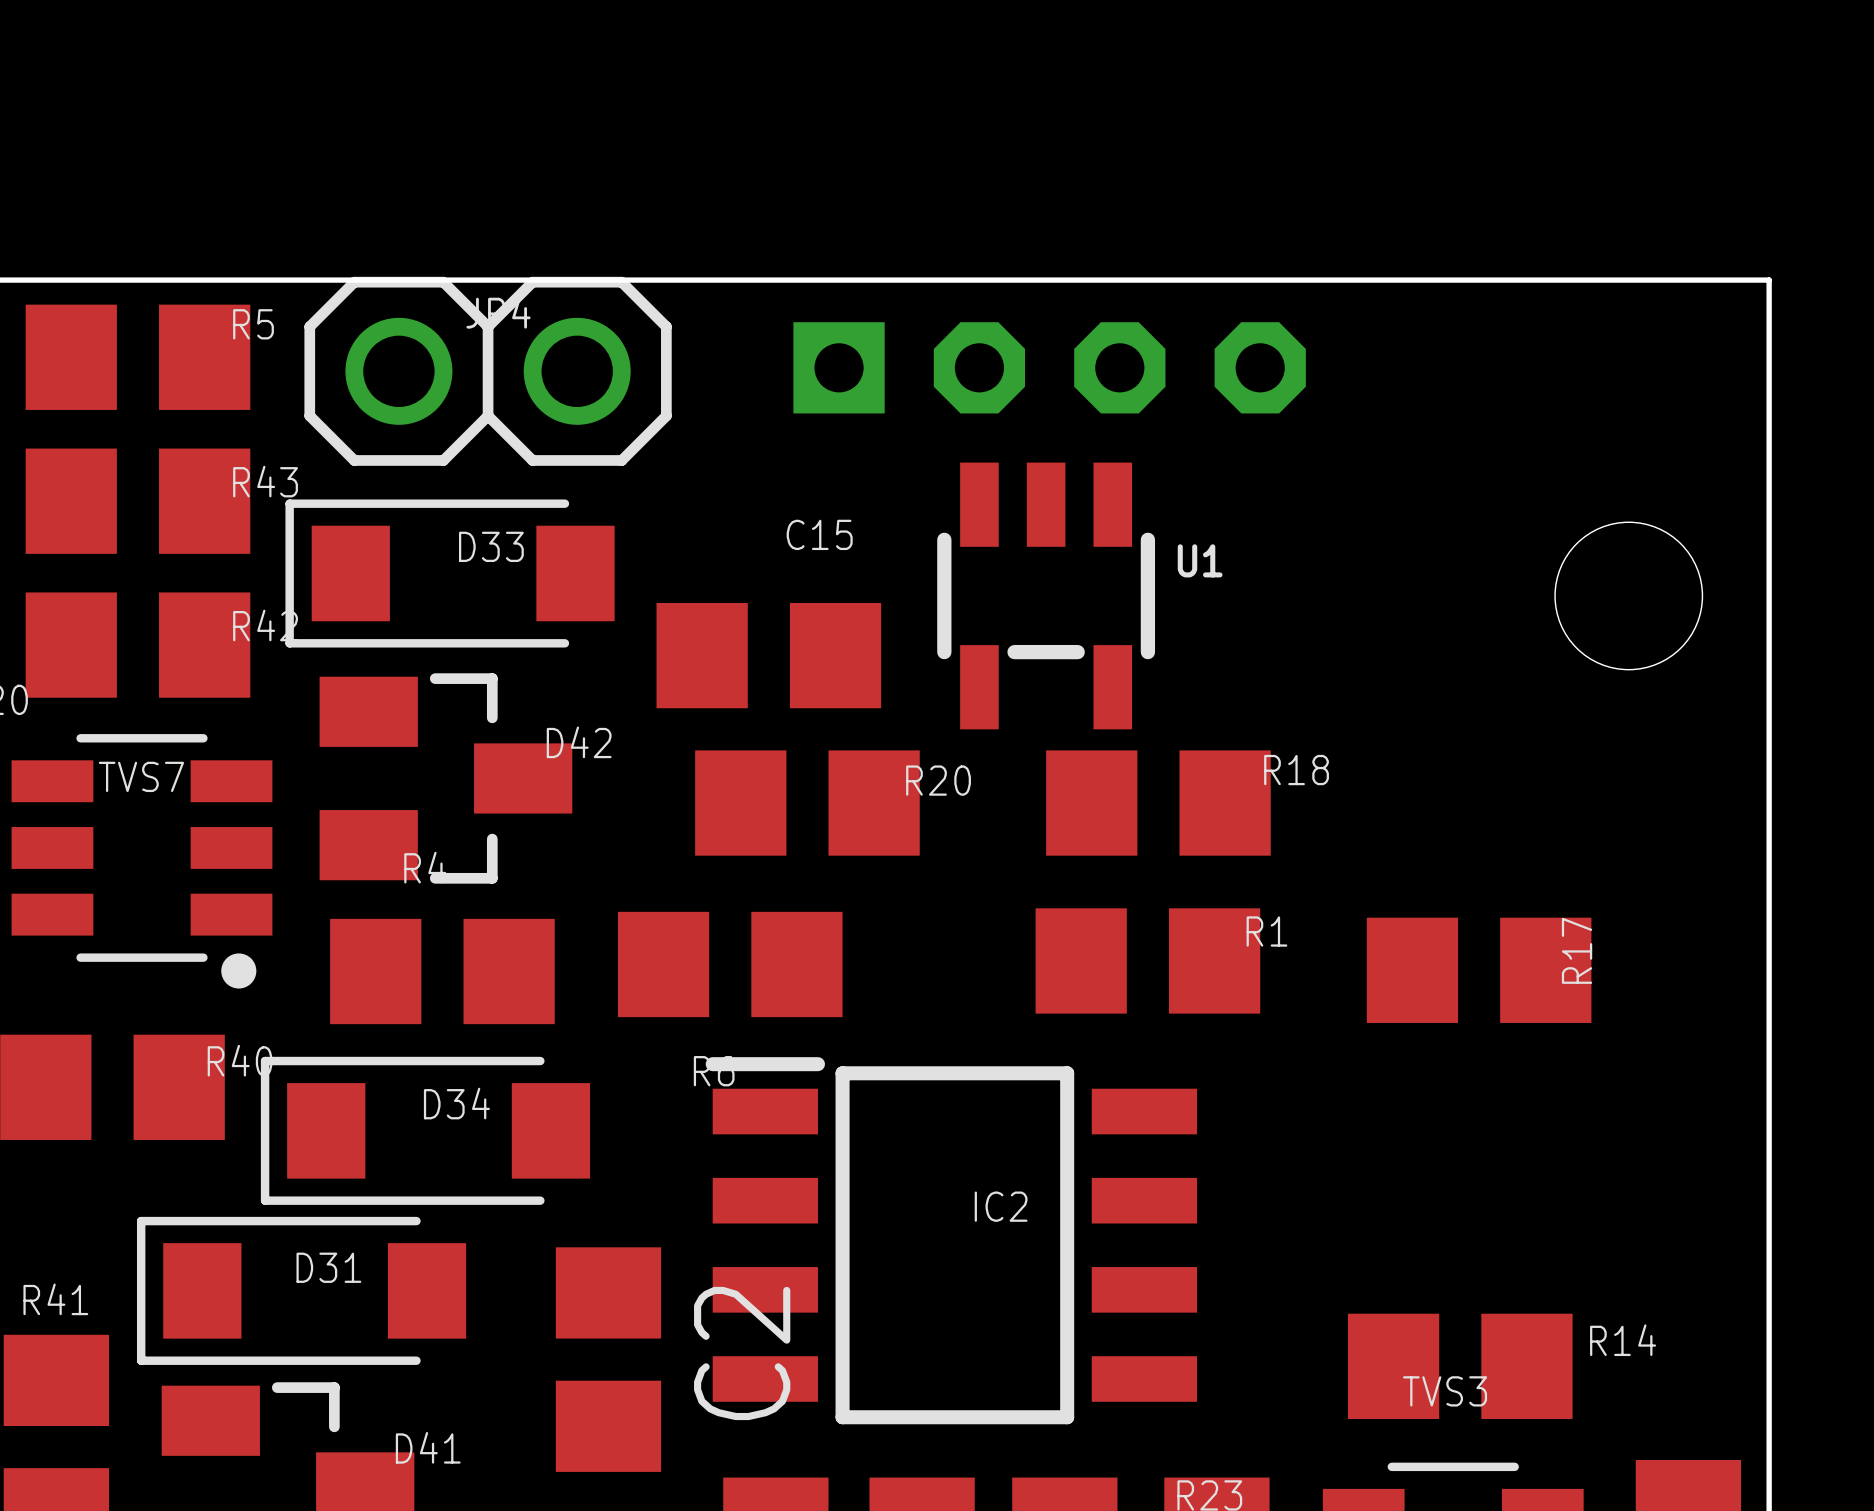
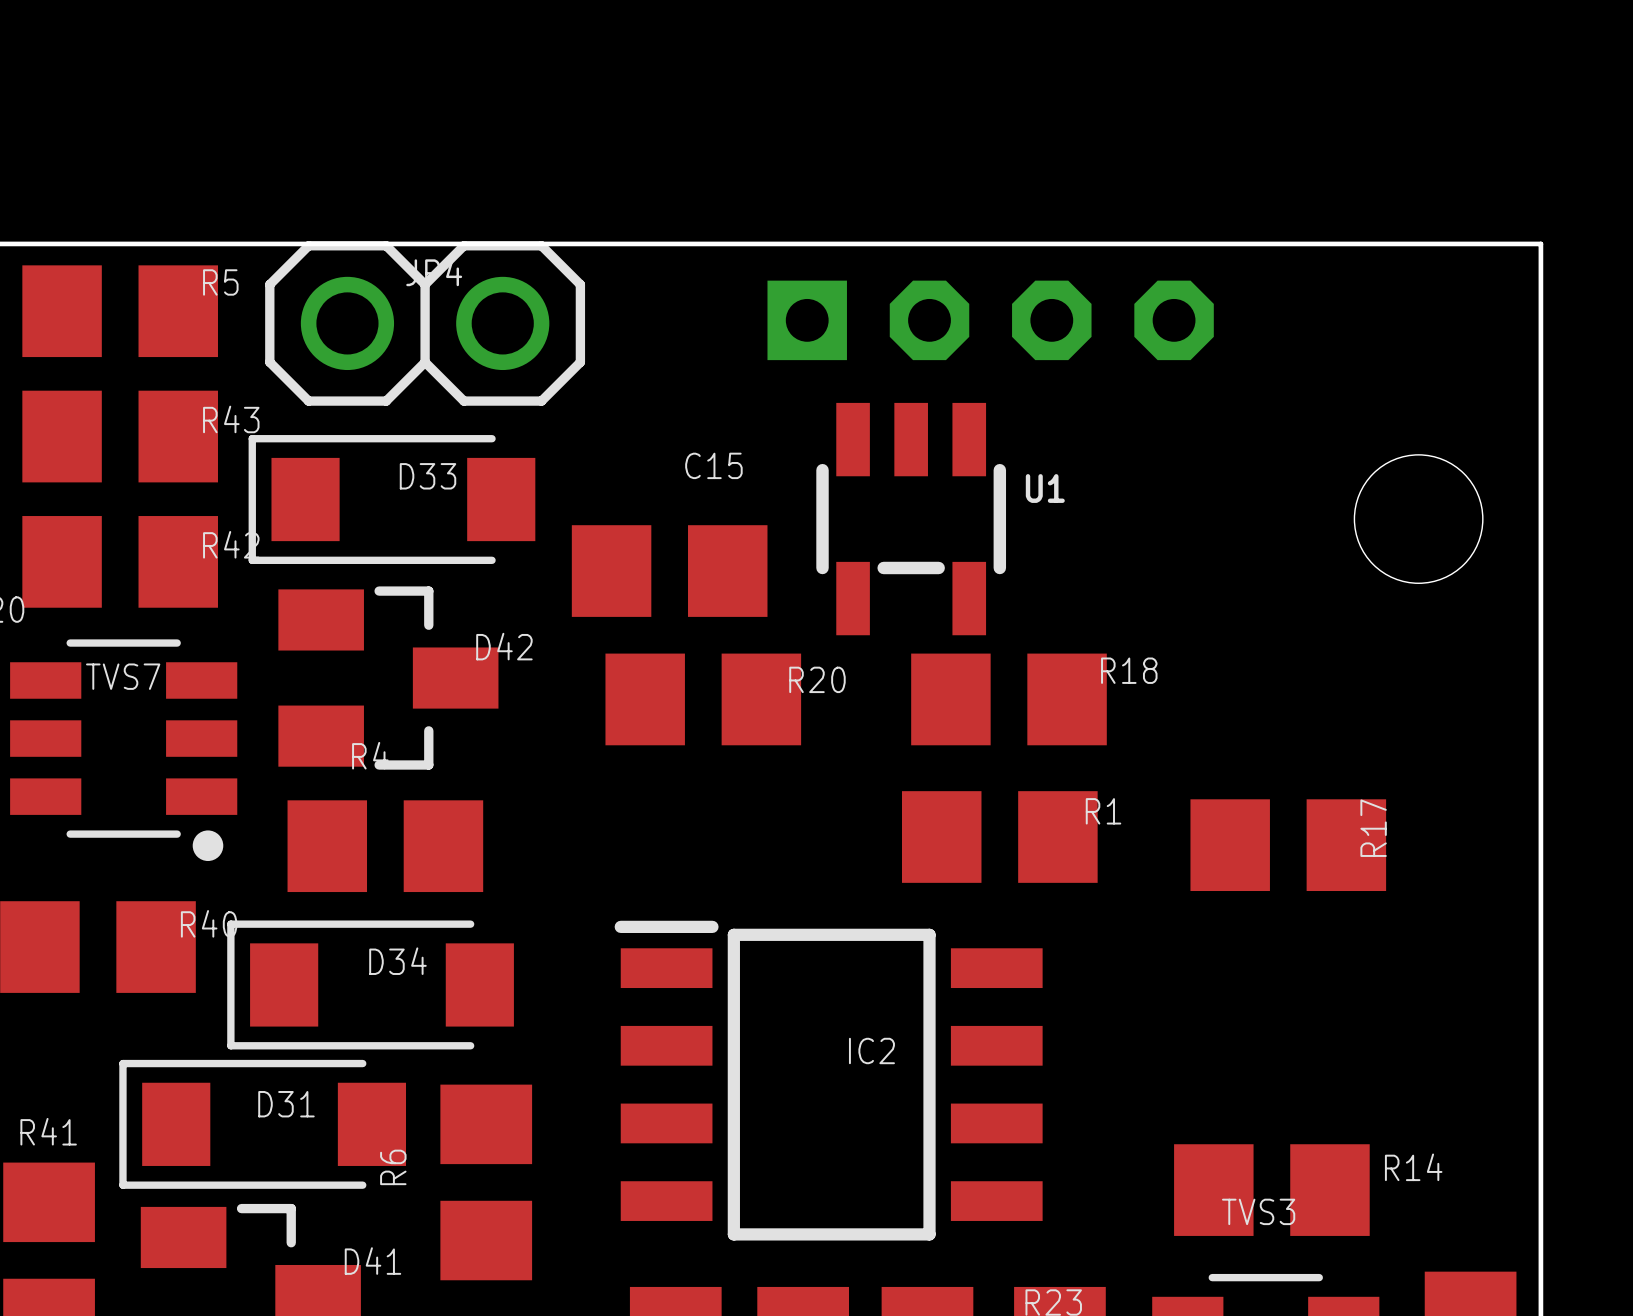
part position: (1049, 367) -> (990, 320)
R6 rotation: 0° (730, 964) -> 90° clockwise (486, 1182)
R6 position: (730, 964) -> (486, 1182)
C2: (608, 1359) -> none

